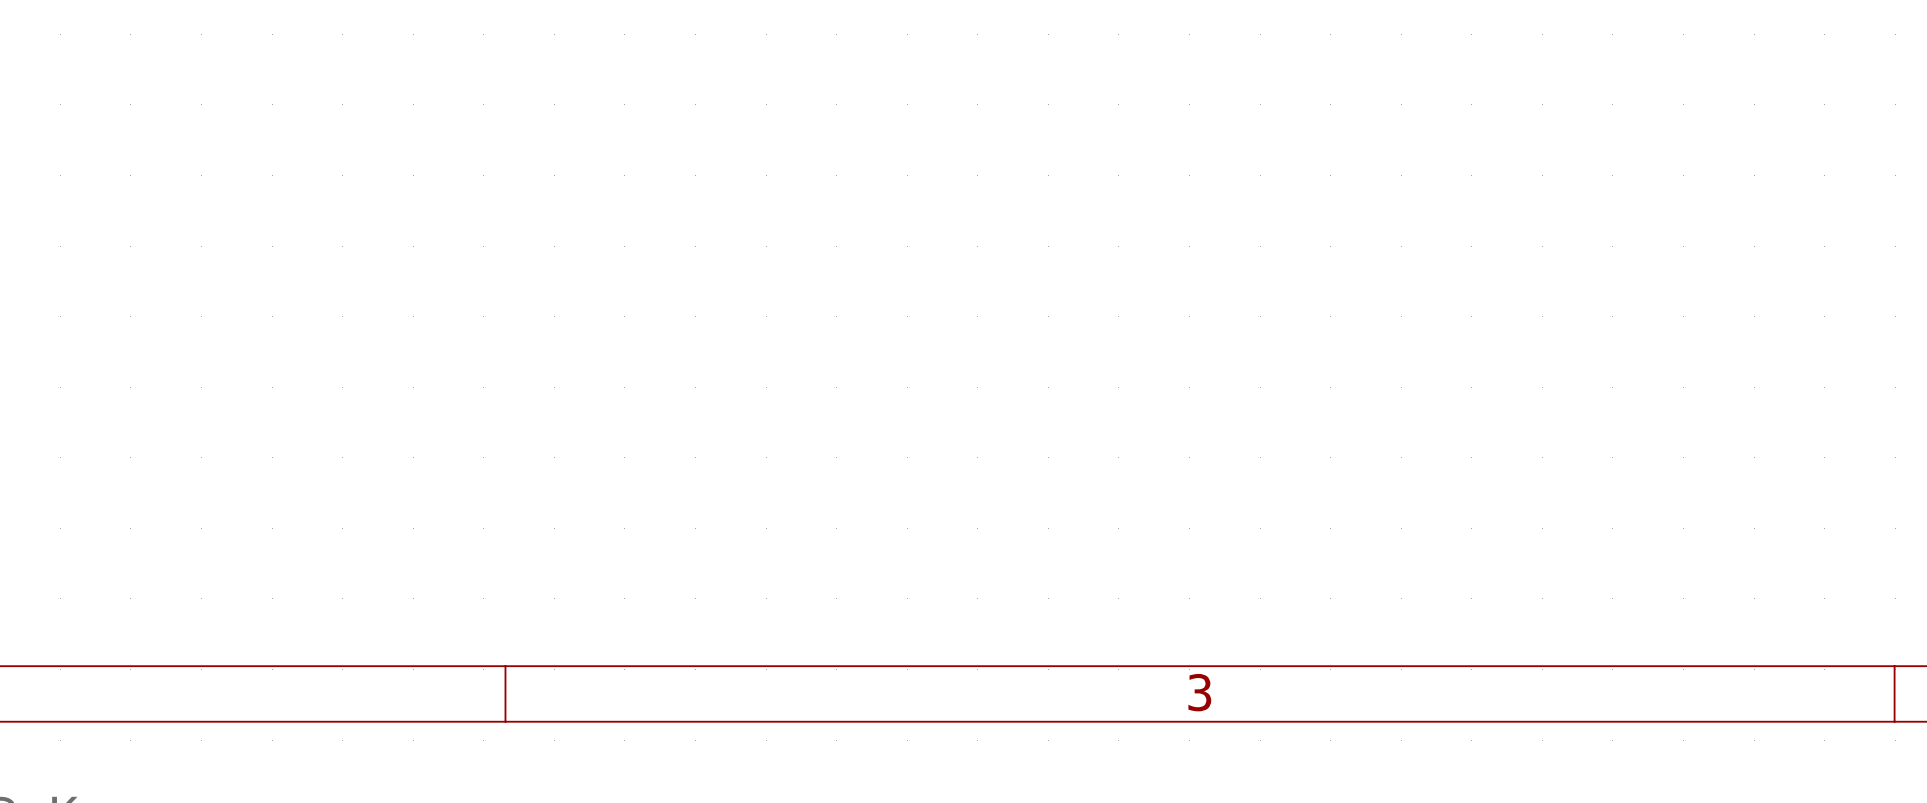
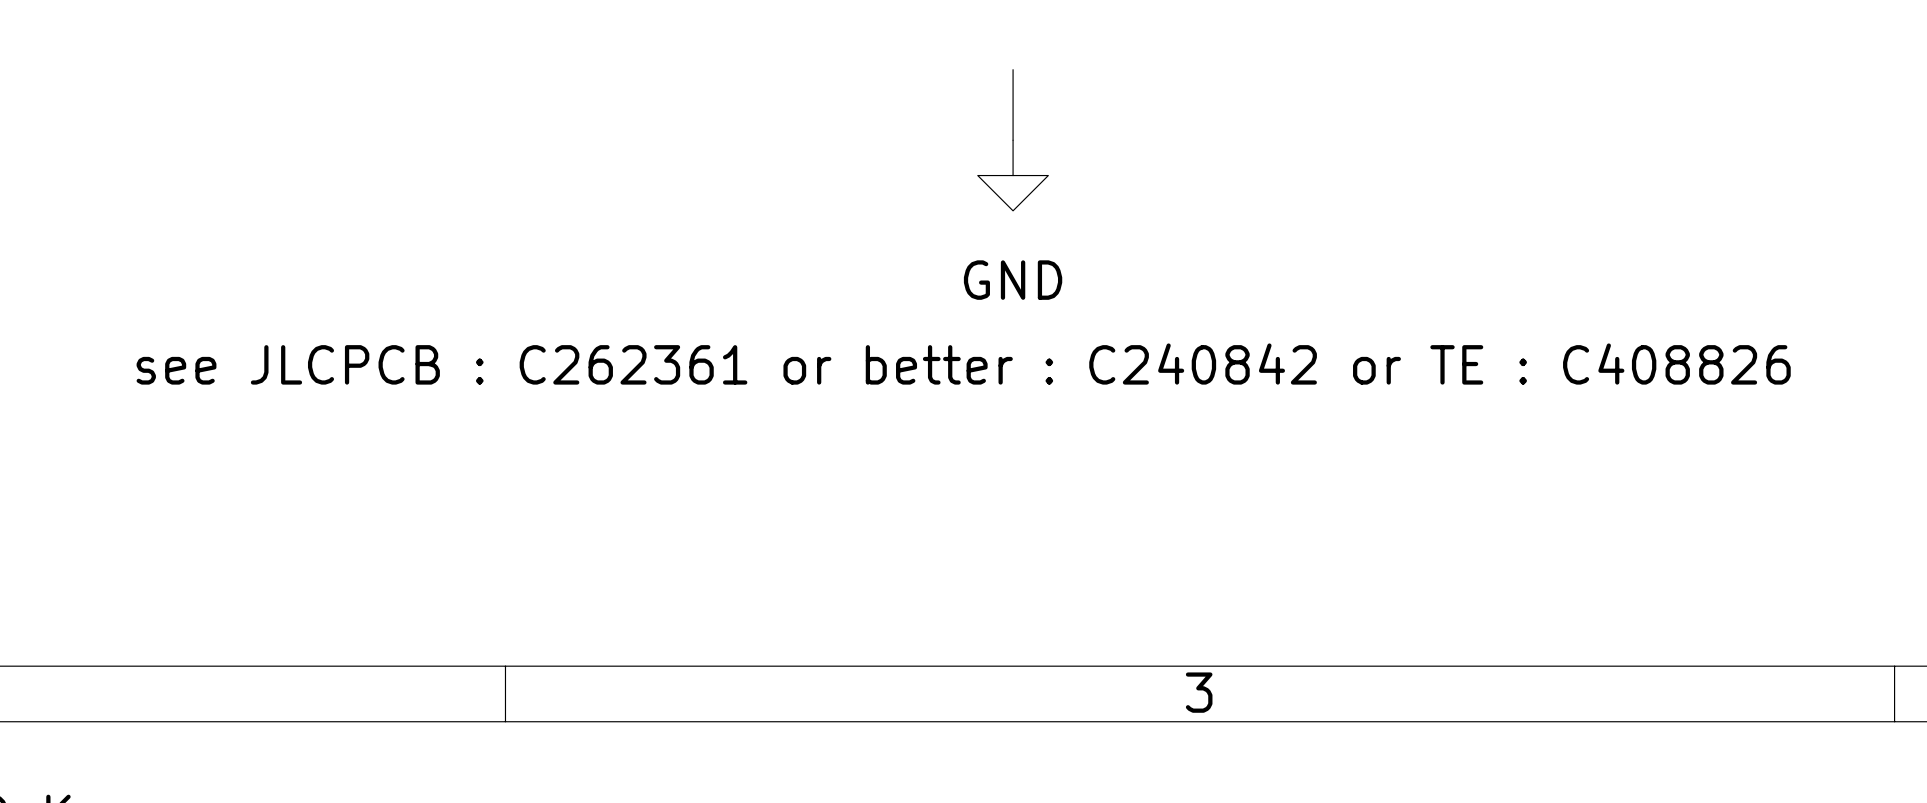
wire: none -> (1013, 69) (1013, 140)
power symbol: none -> GND (1013, 175)
text: none -> see JLCPCB : C262361 or better : C240842 or TE : C408826 (963, 364)

